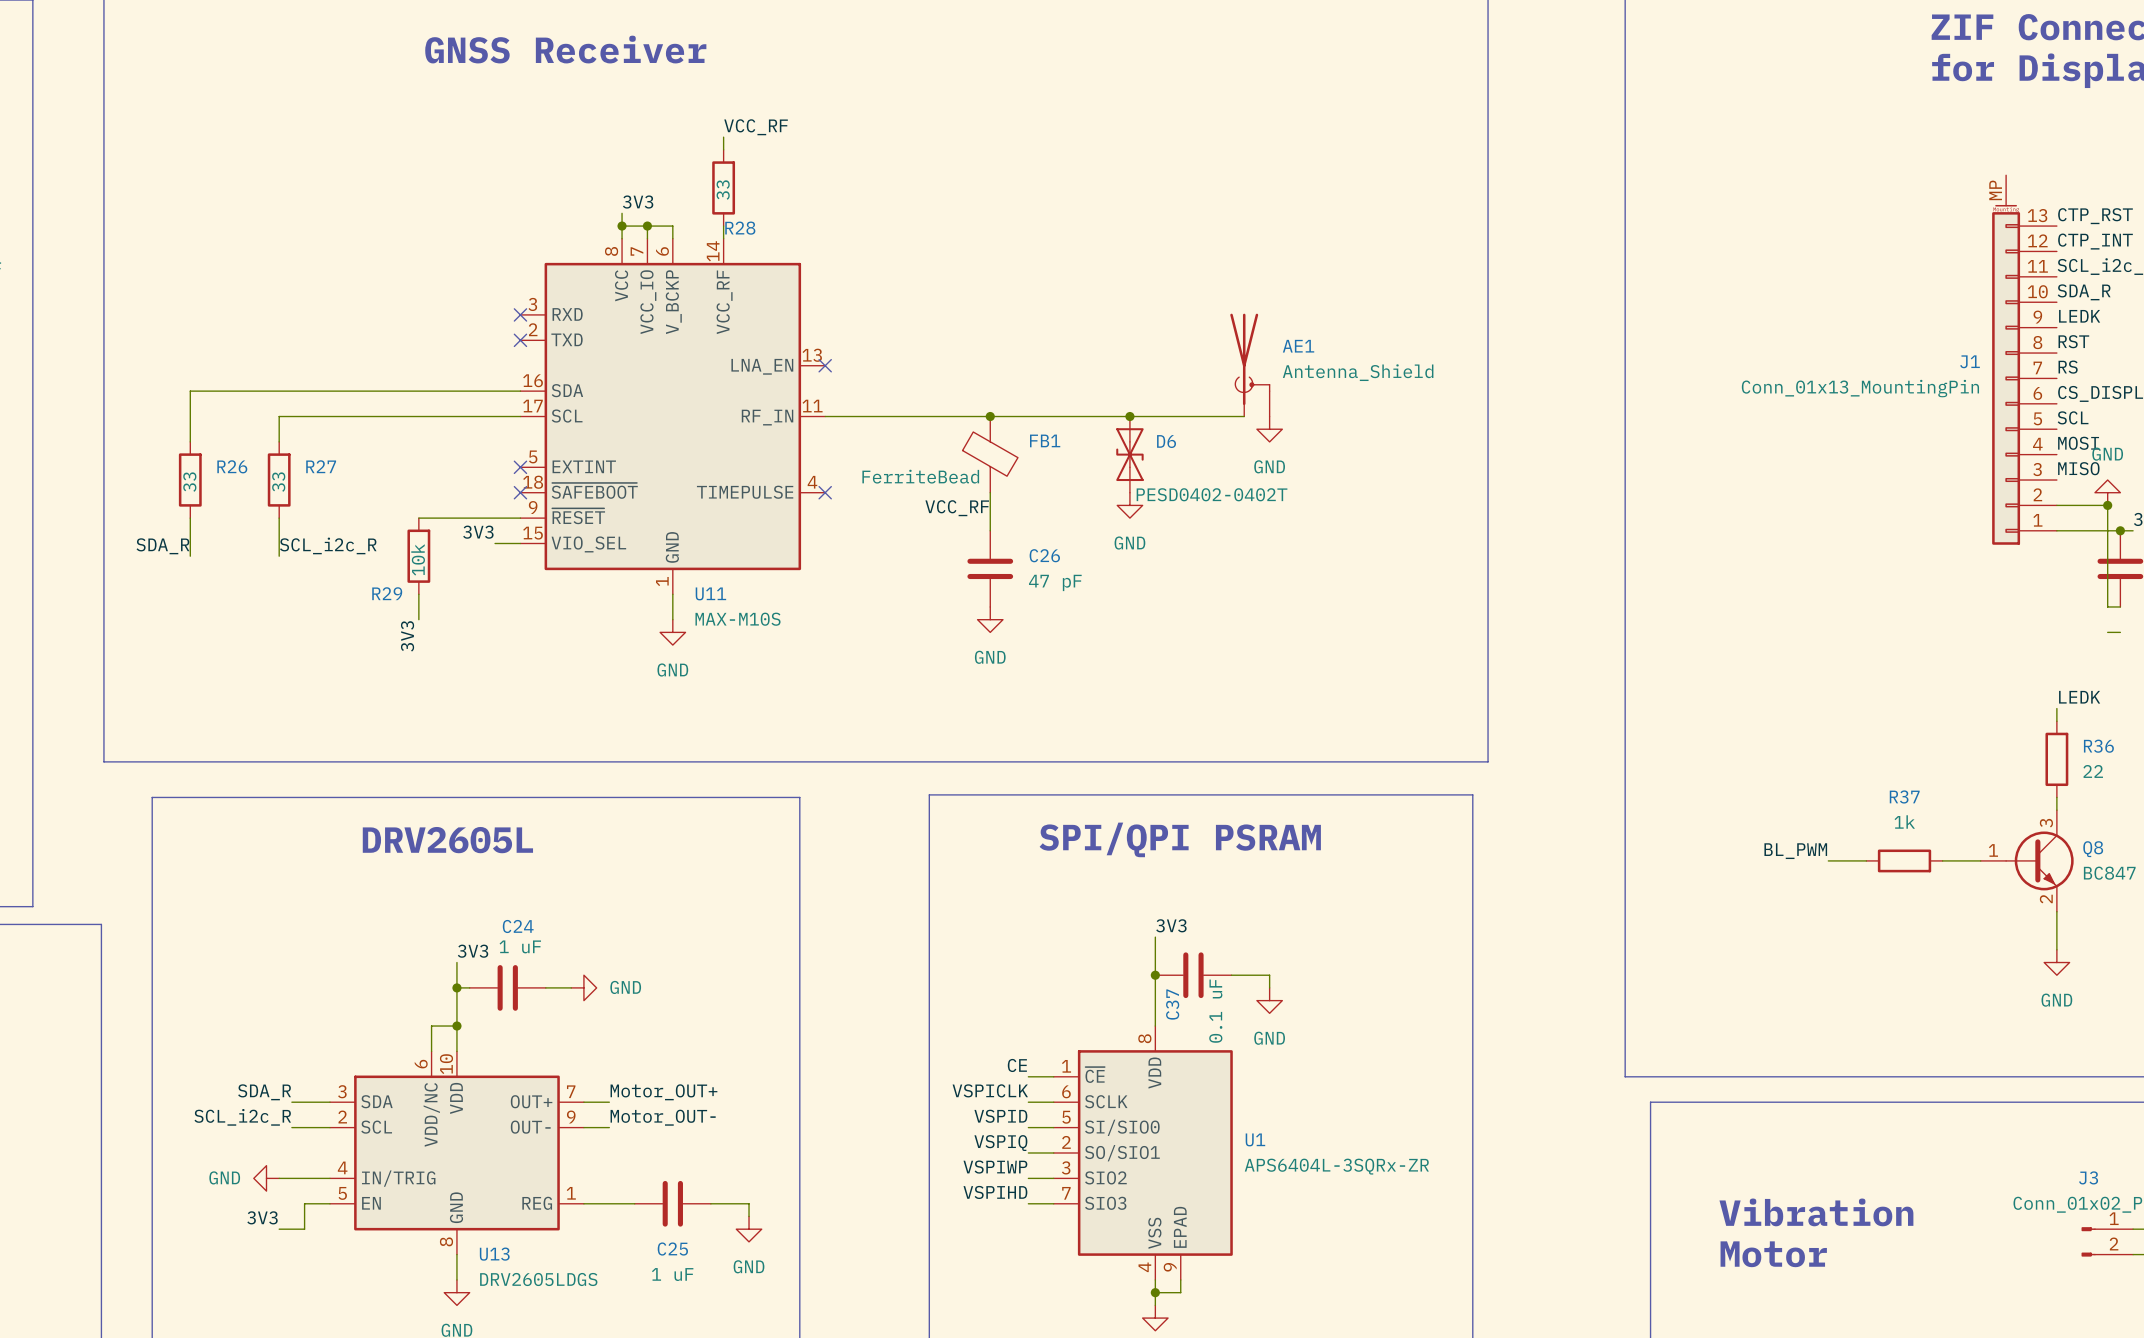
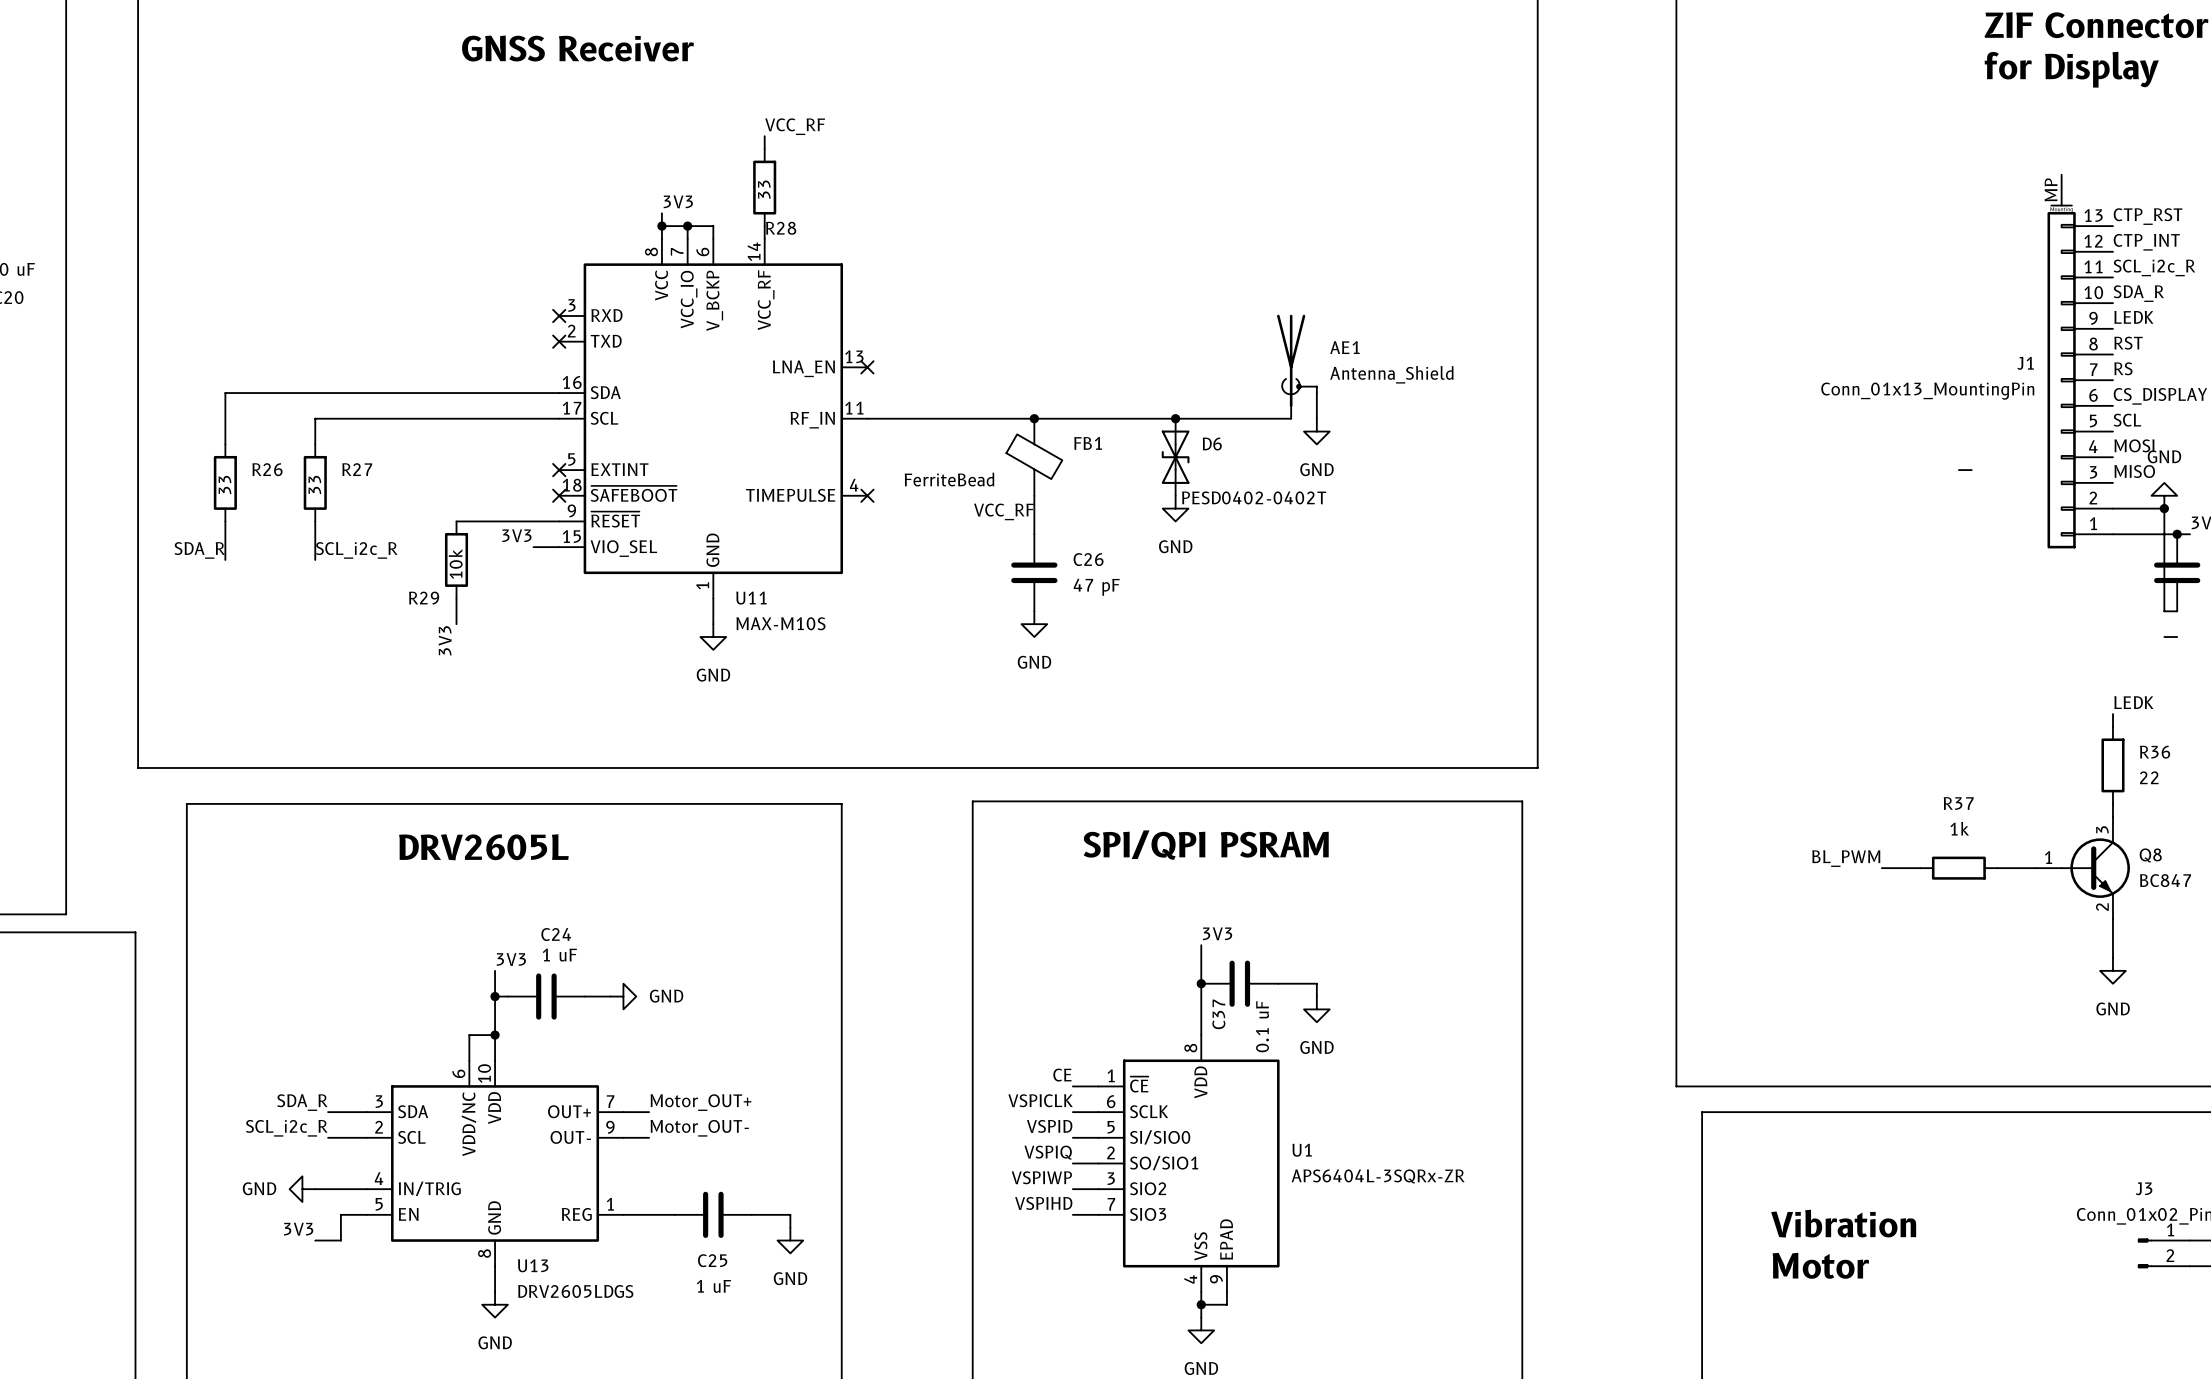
wire: none -> (1958, 470) (1971, 470)

